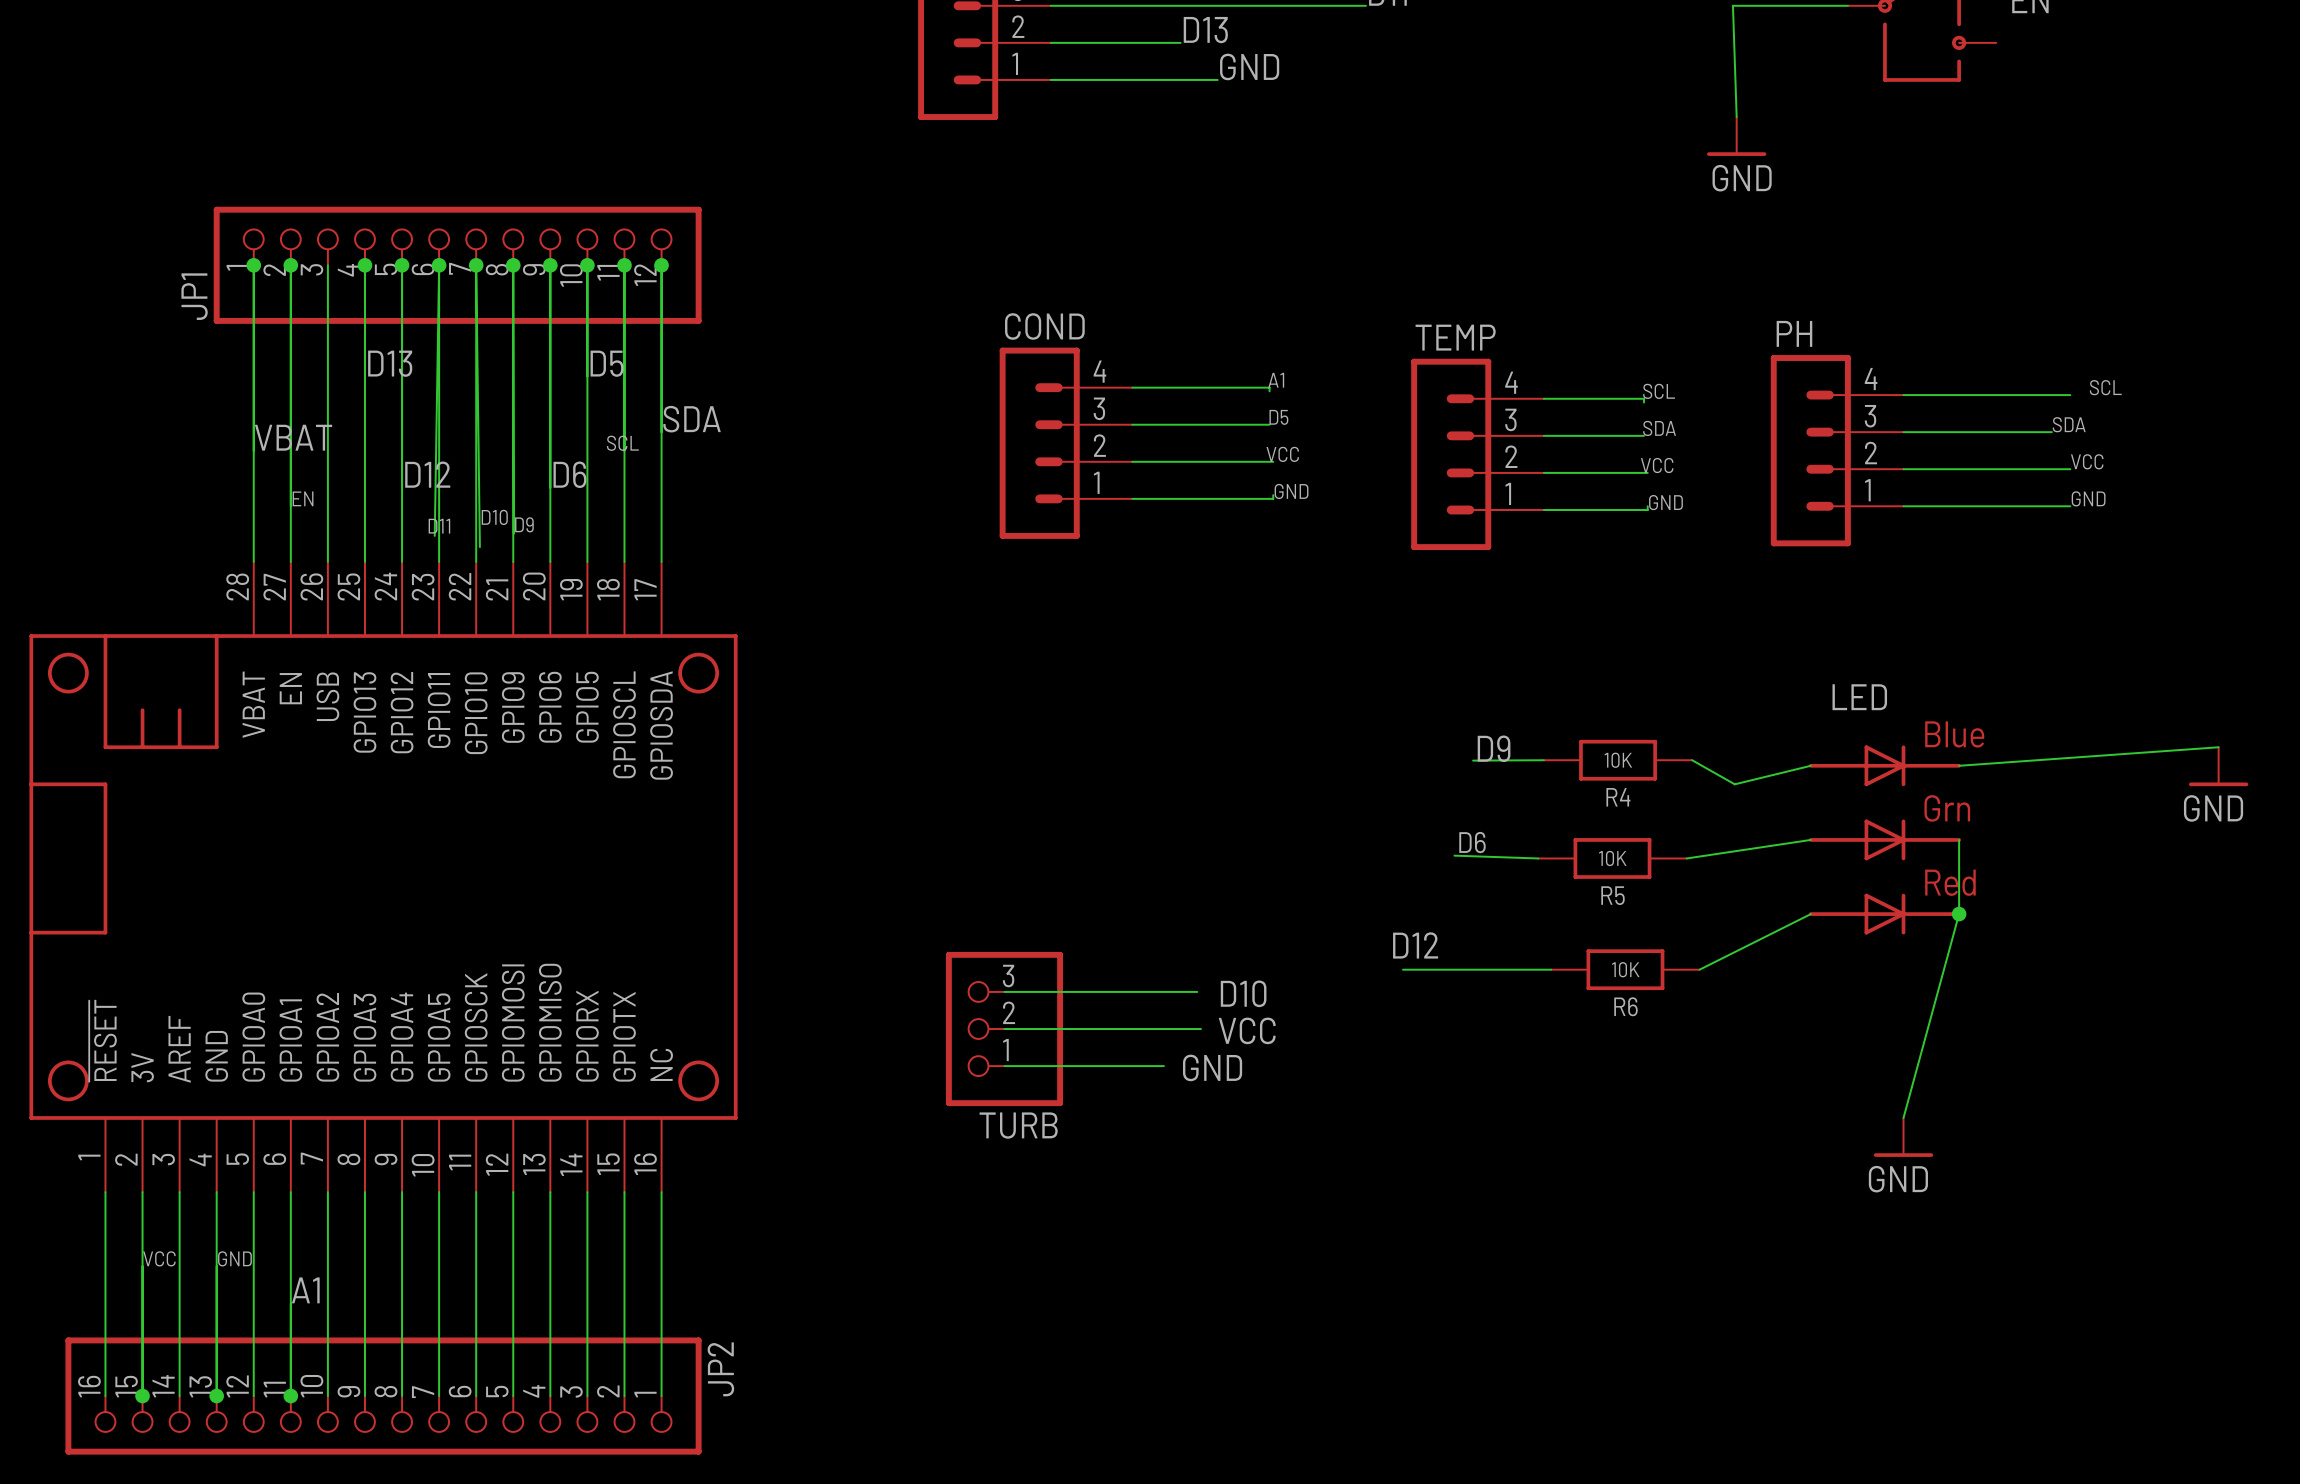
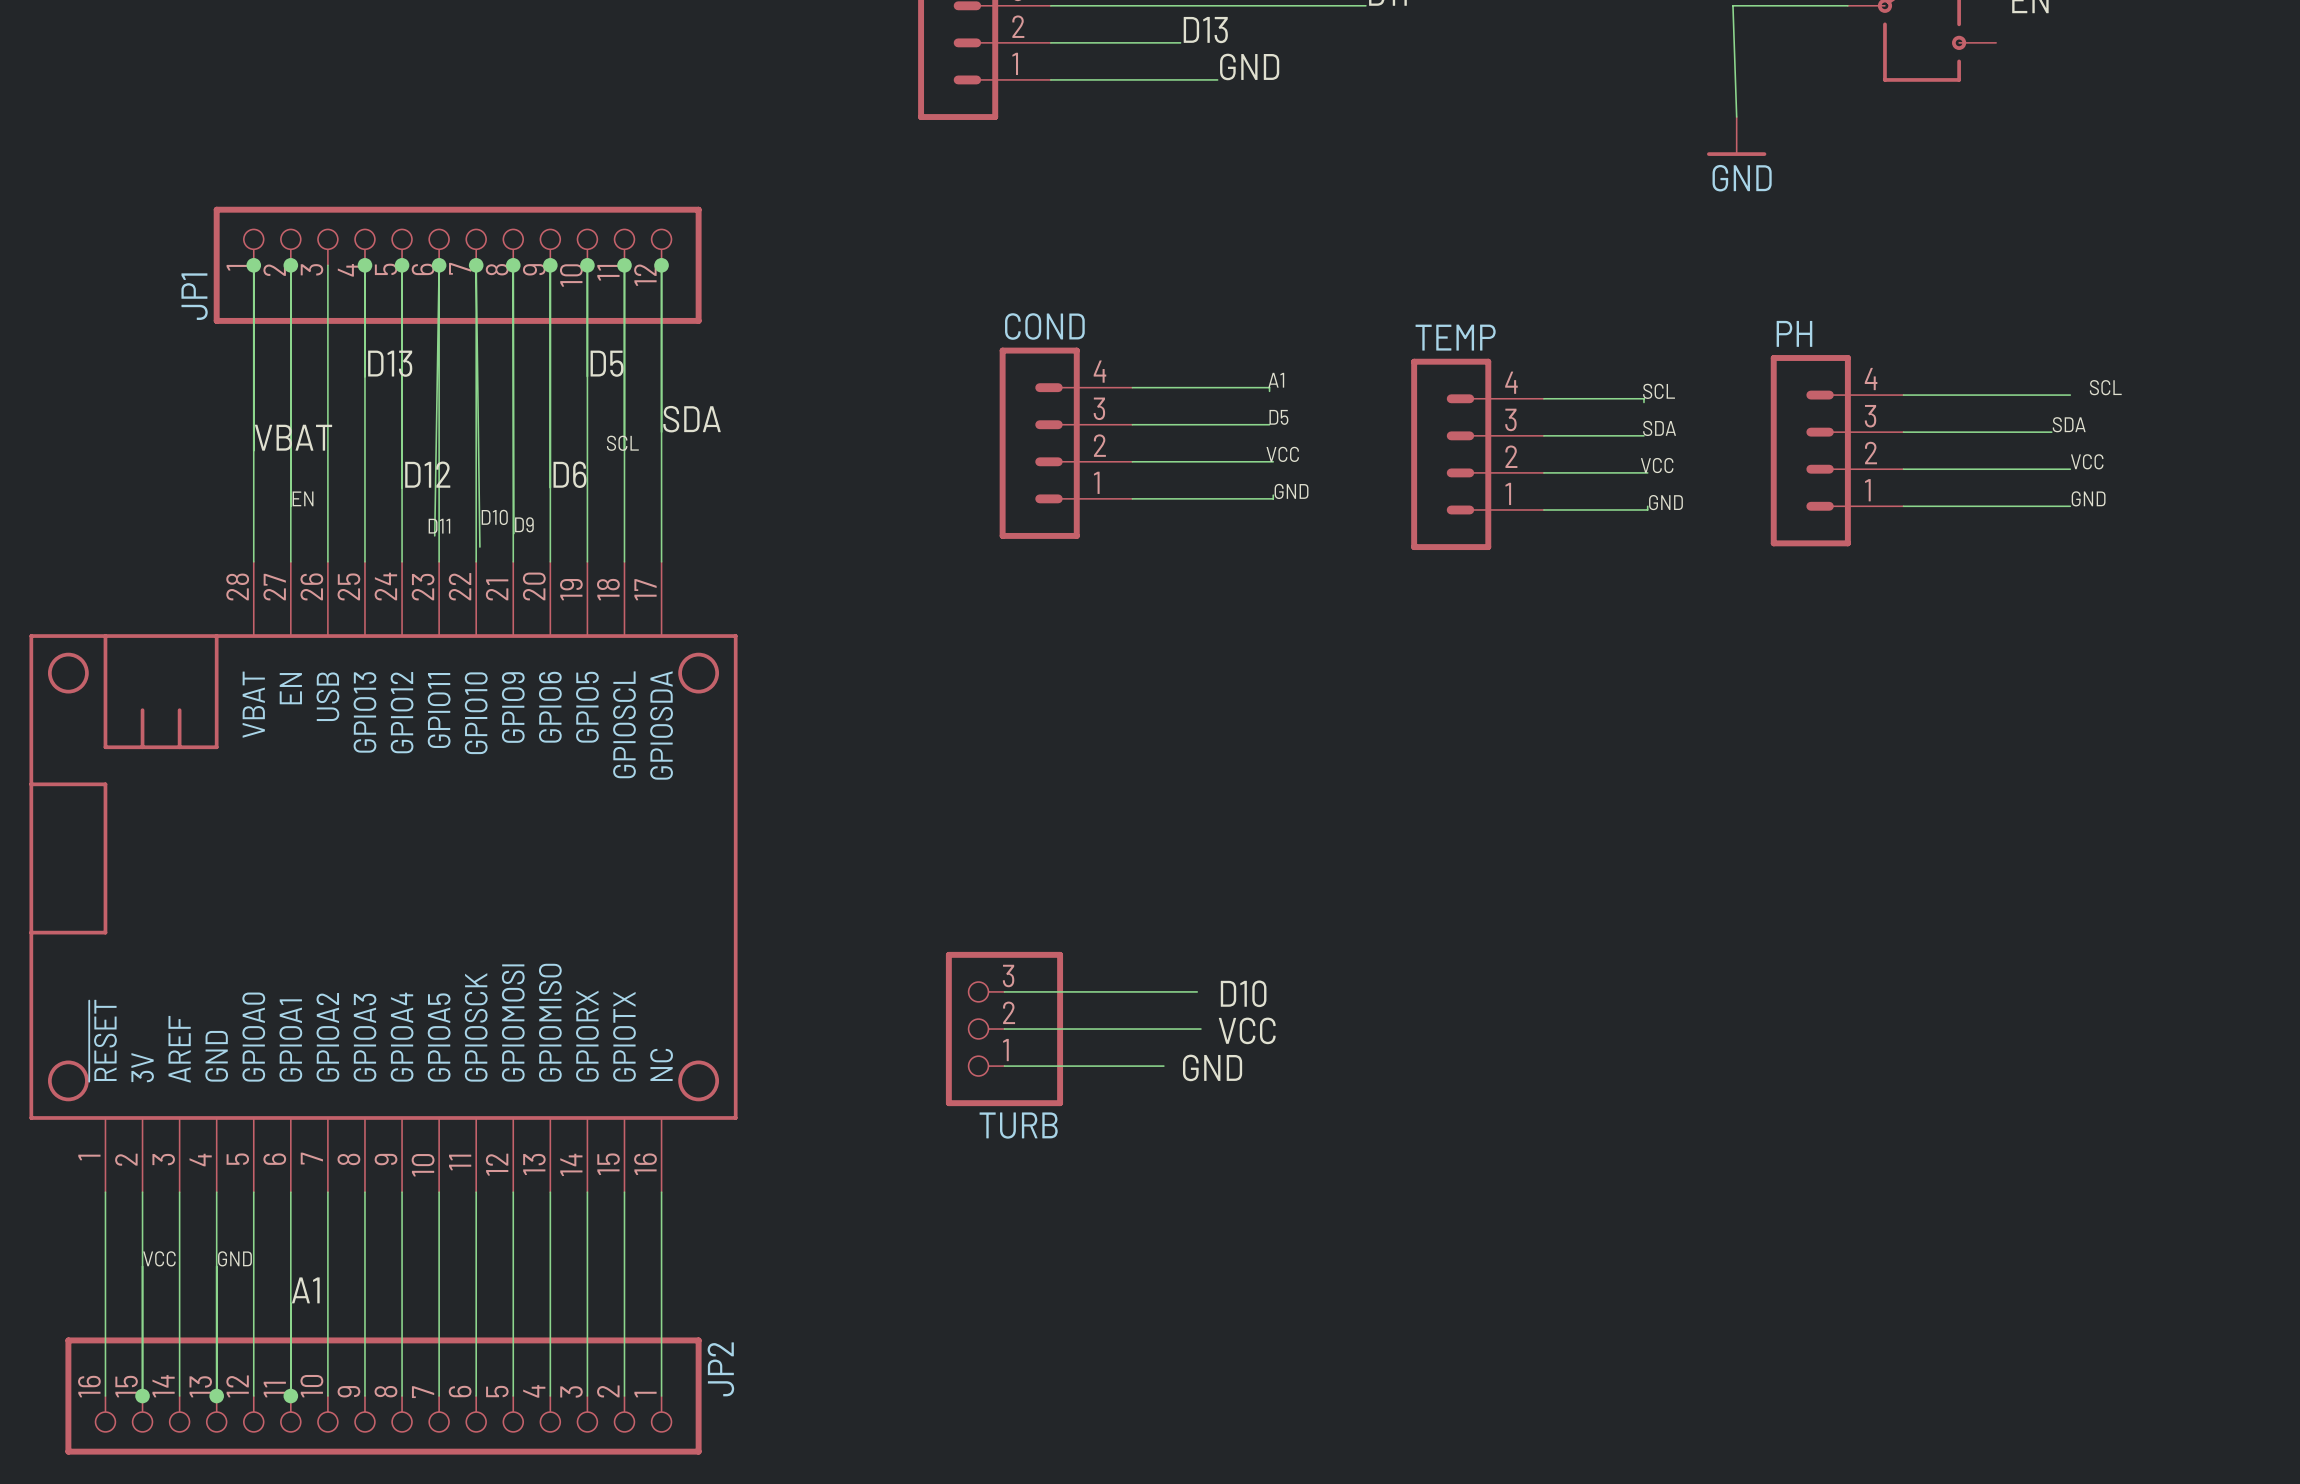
wire: (2218, 747) (1959, 765) -> none
label: D9 (1494, 748) -> none
wire: (1543, 760) (1473, 760) -> none
R4: 10K (1618, 760) -> none
wire: (1692, 760) (1734, 784) (1810, 765) -> none
power symbol: GND (2218, 766) -> none
wire: (1810, 839) (1686, 858) -> none
LED: (1884, 839) -> none
wire: (1959, 839) (1959, 914) (1903, 1117) -> none
label: D6 (1472, 842) -> none
wire: (1454, 855) (1538, 858) -> none
R5: 10K (1612, 858) -> none
wire: (1810, 914) (1699, 969) -> none
junction: (1959, 914) -> none
label: D12 (1415, 945) -> none
wire: (1403, 969) (1551, 969) -> none
R6: 10K (1625, 969) -> none
power symbol: GND (1903, 1137) -> none

